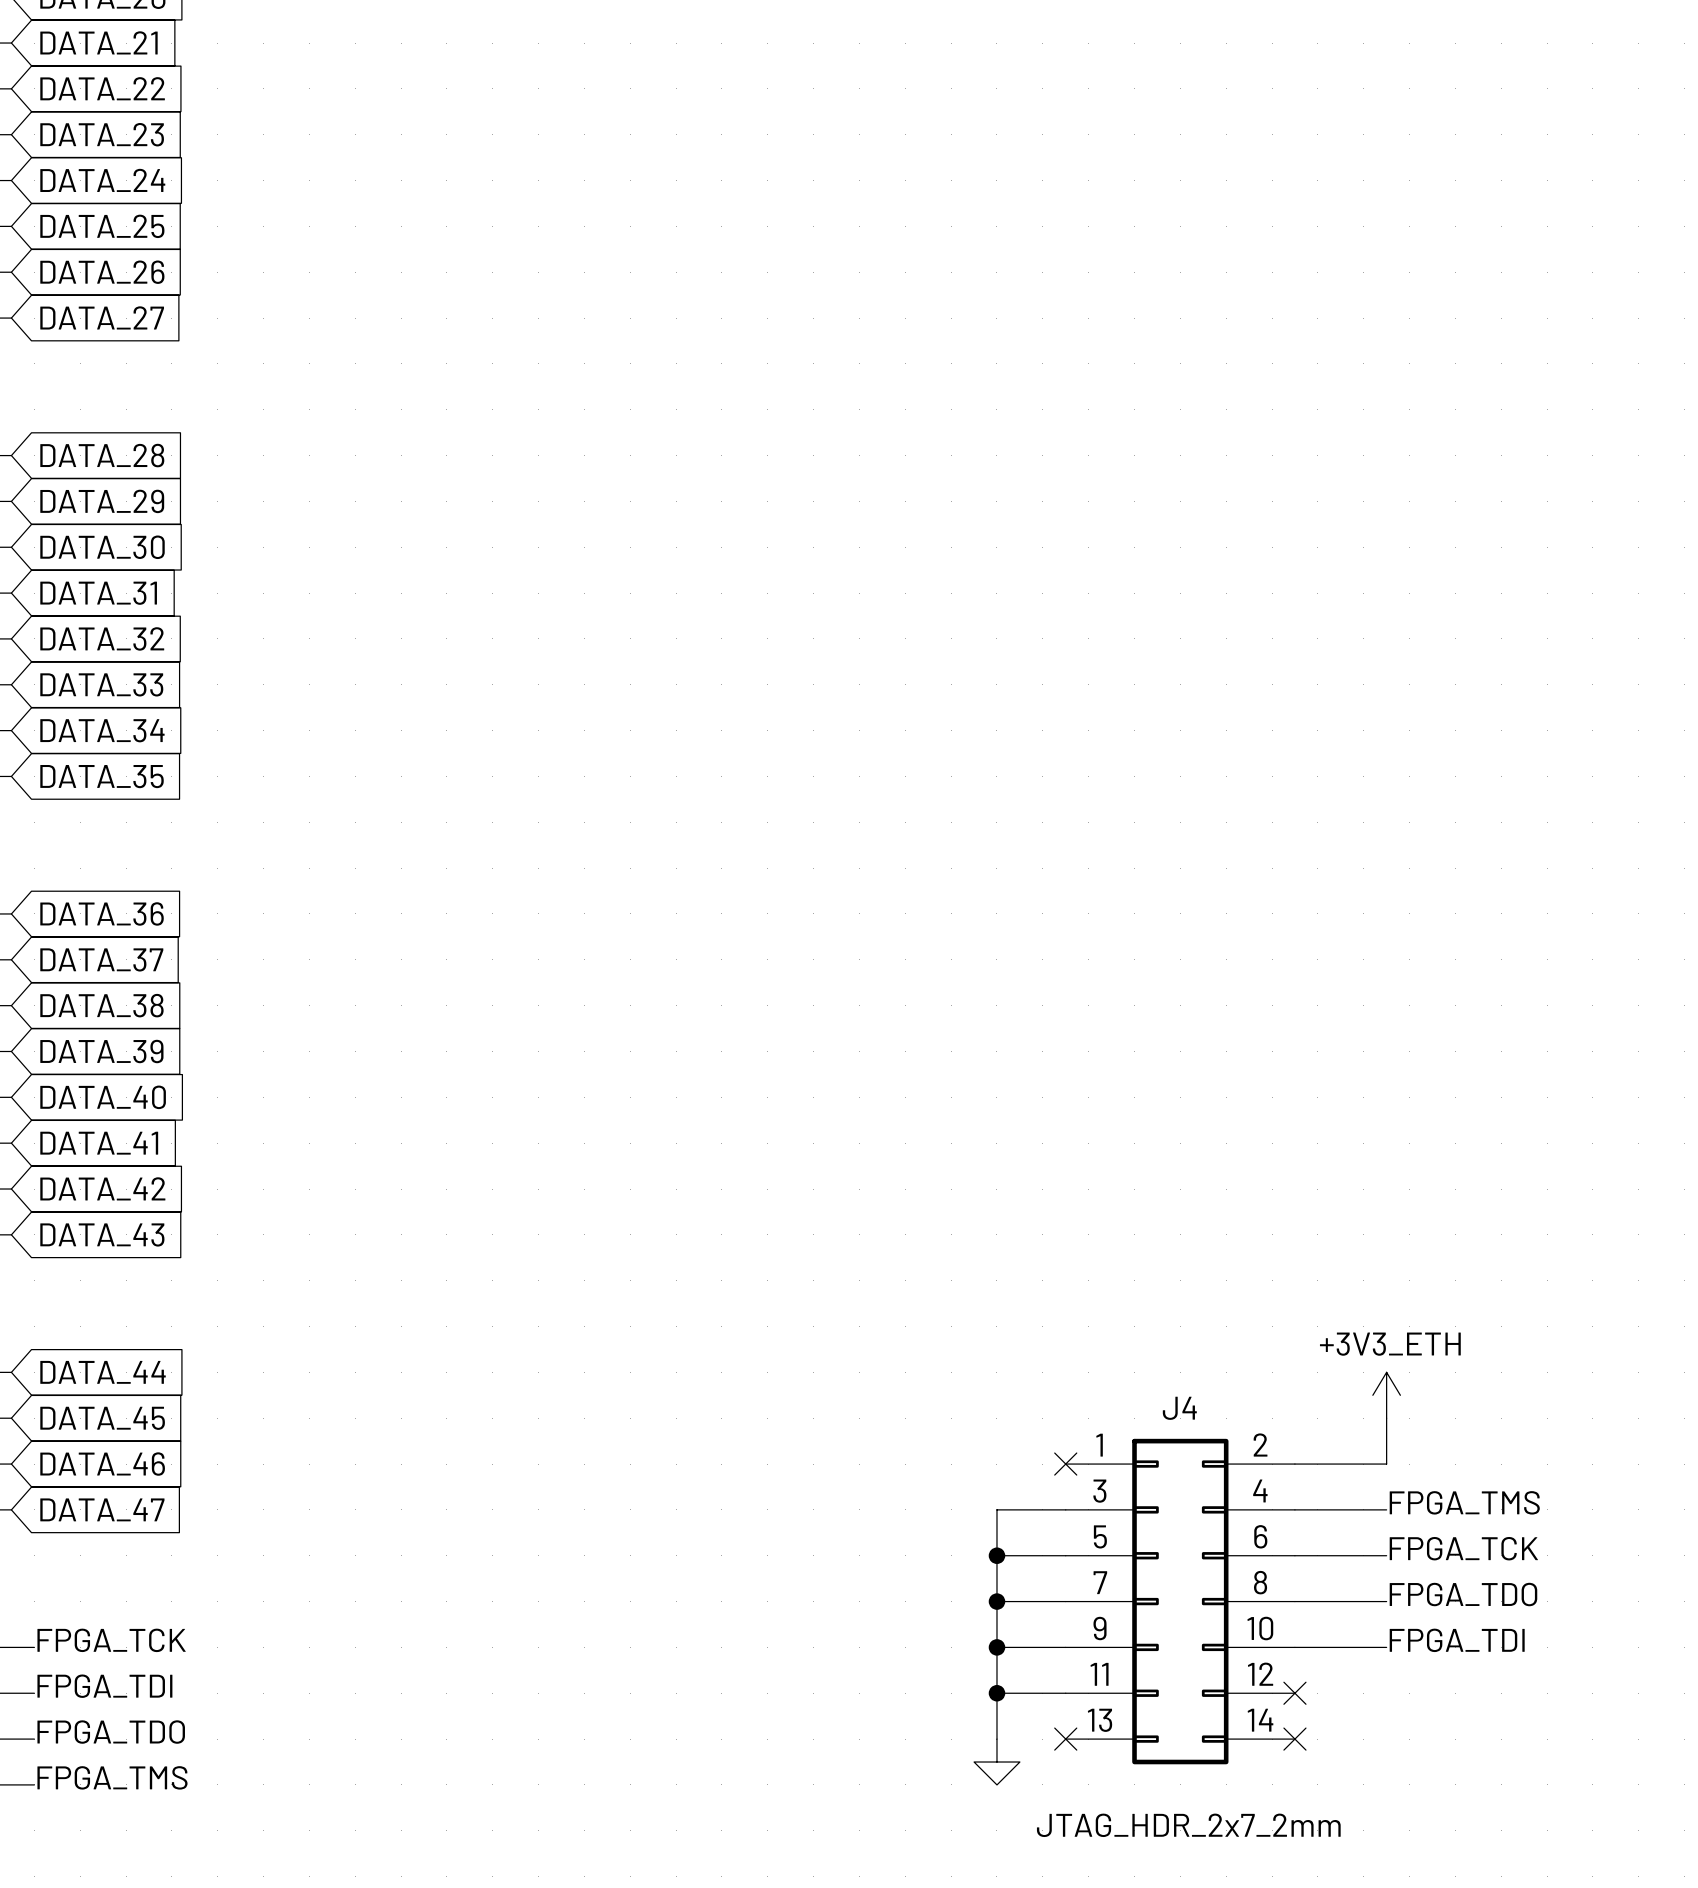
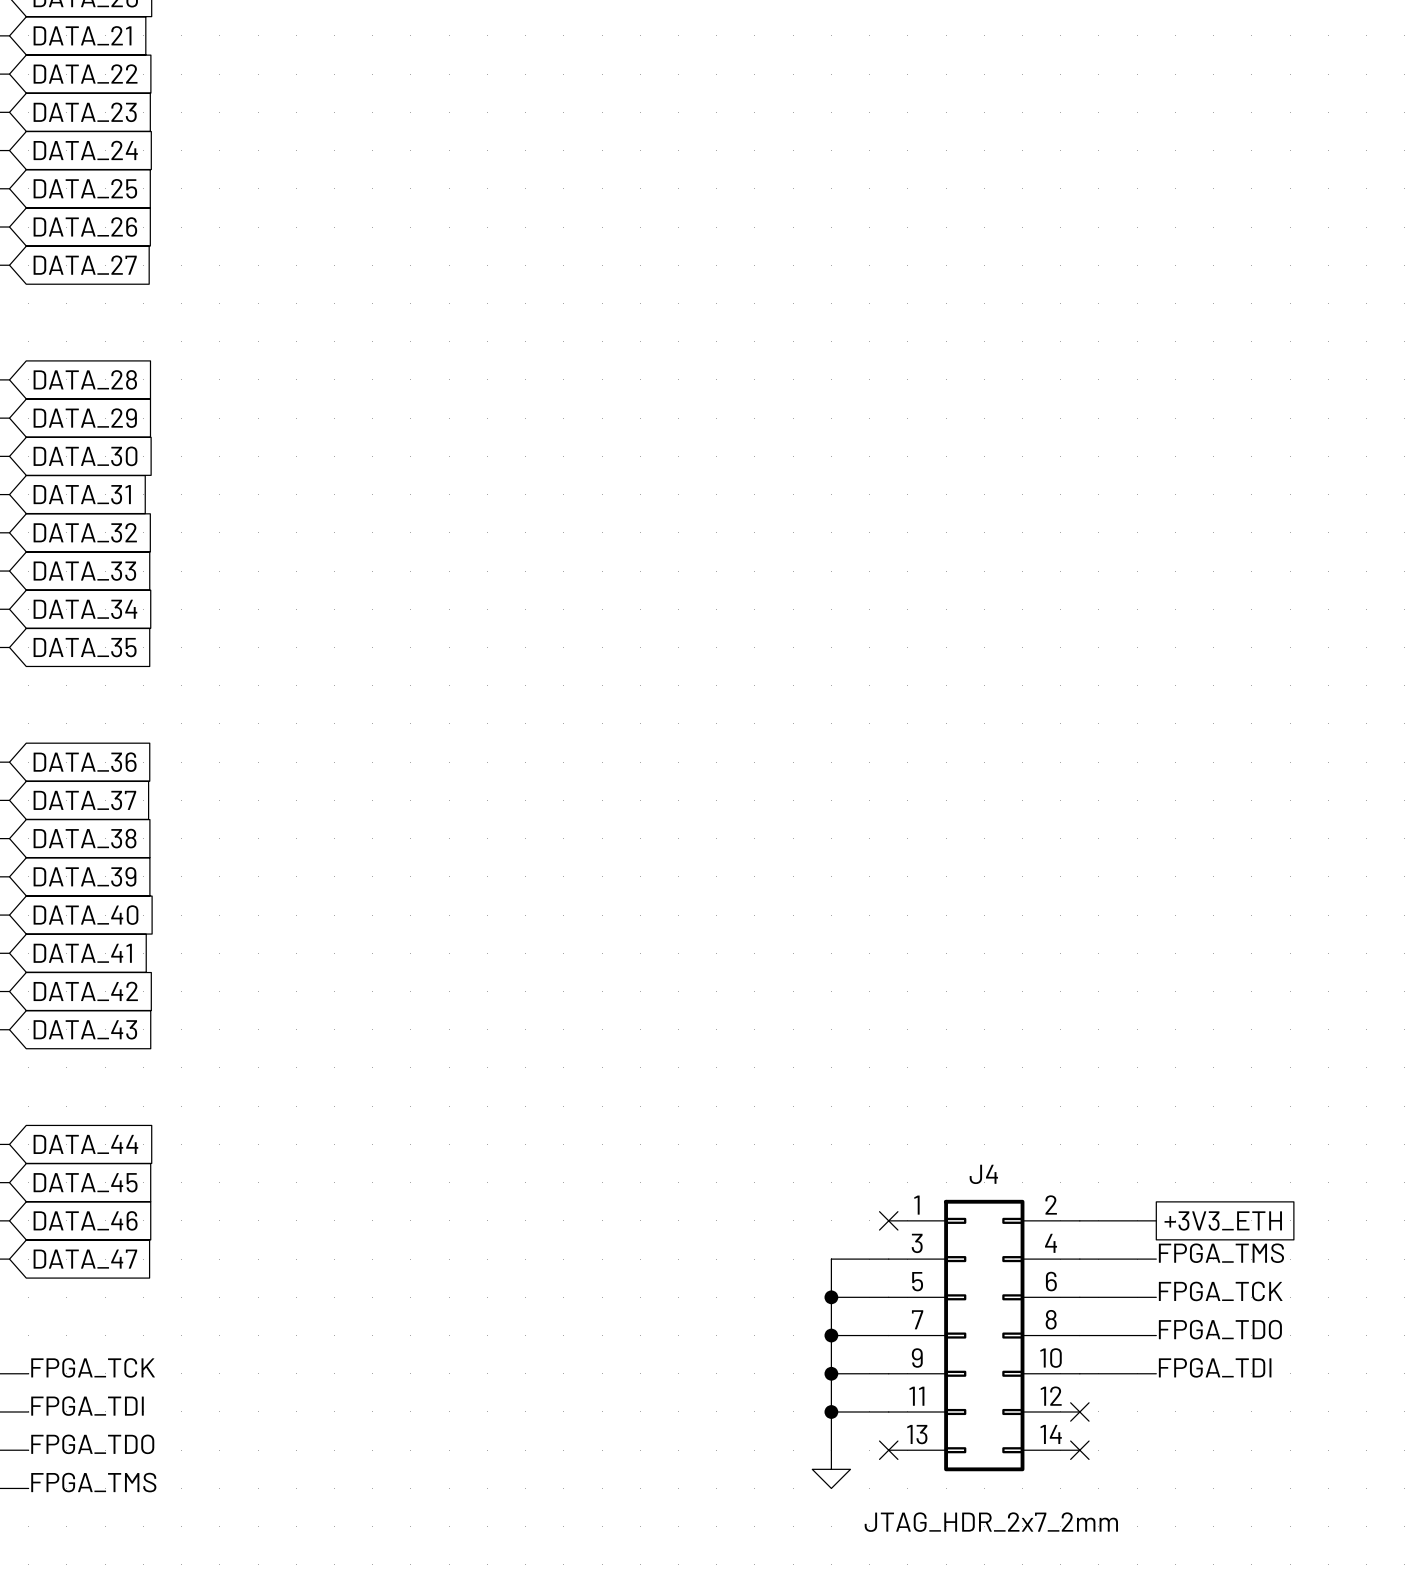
power symbol: +3V3_ETH (1386, 1395) -> none
wire: (1386, 1418) (1386, 1464) -> none
global label: none -> +3V3_ETH (1223, 1220)

